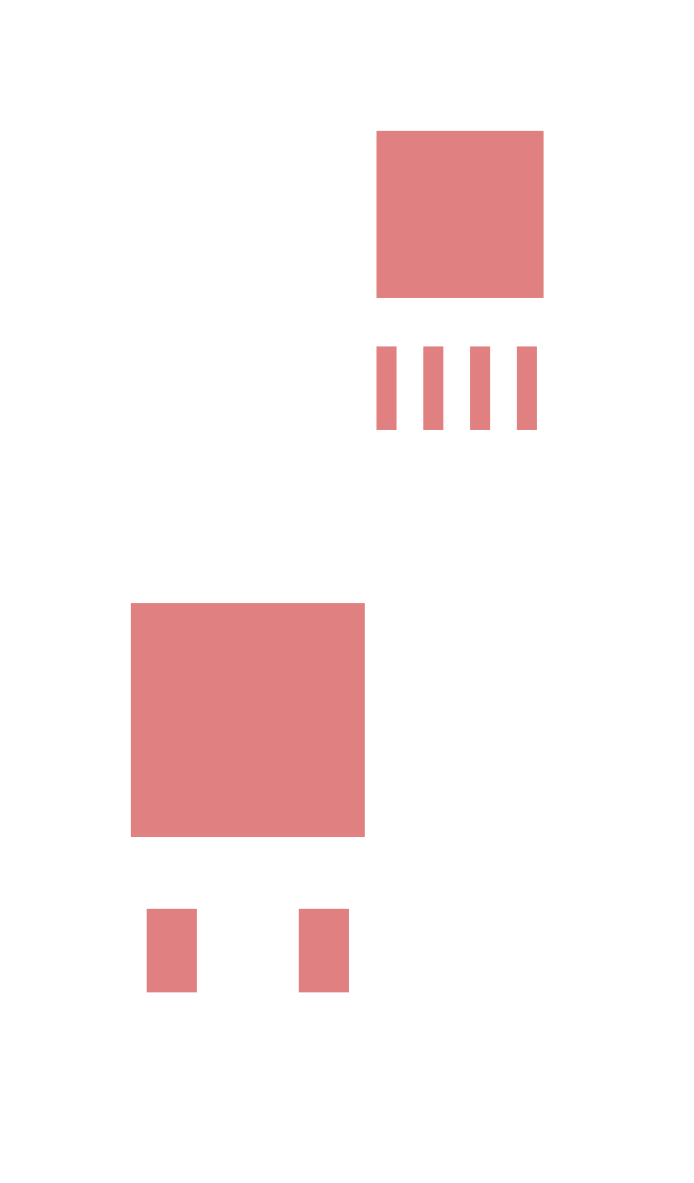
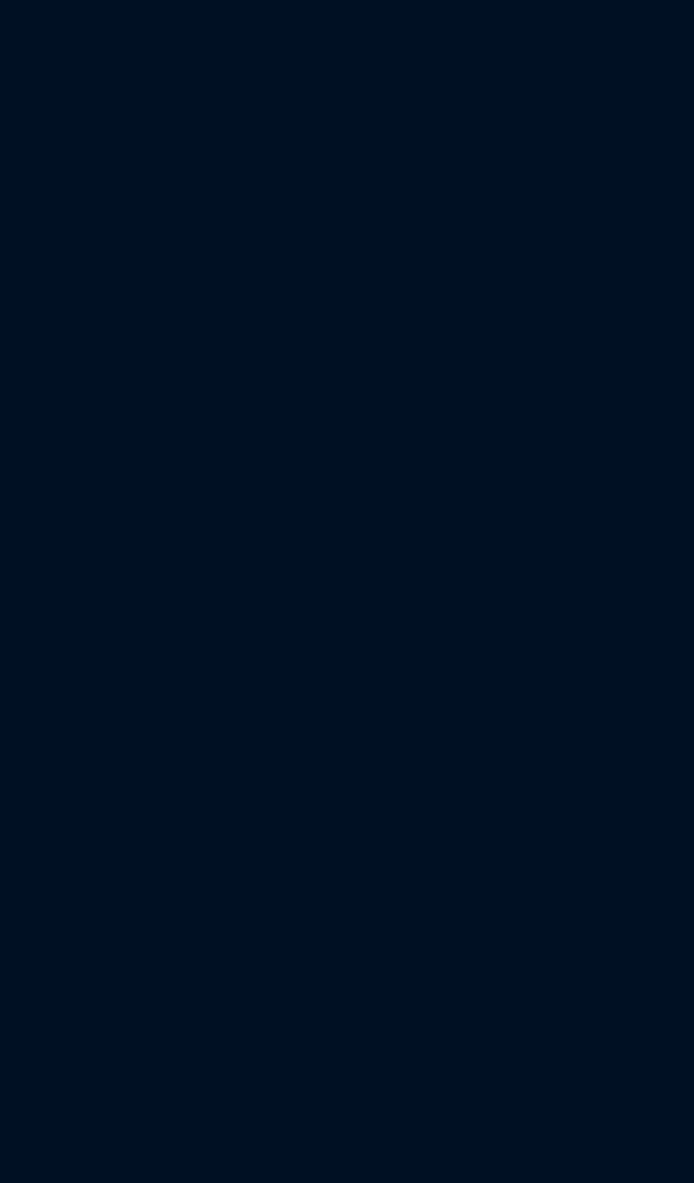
part: (460, 280) -> none
part: (247, 797) -> none

